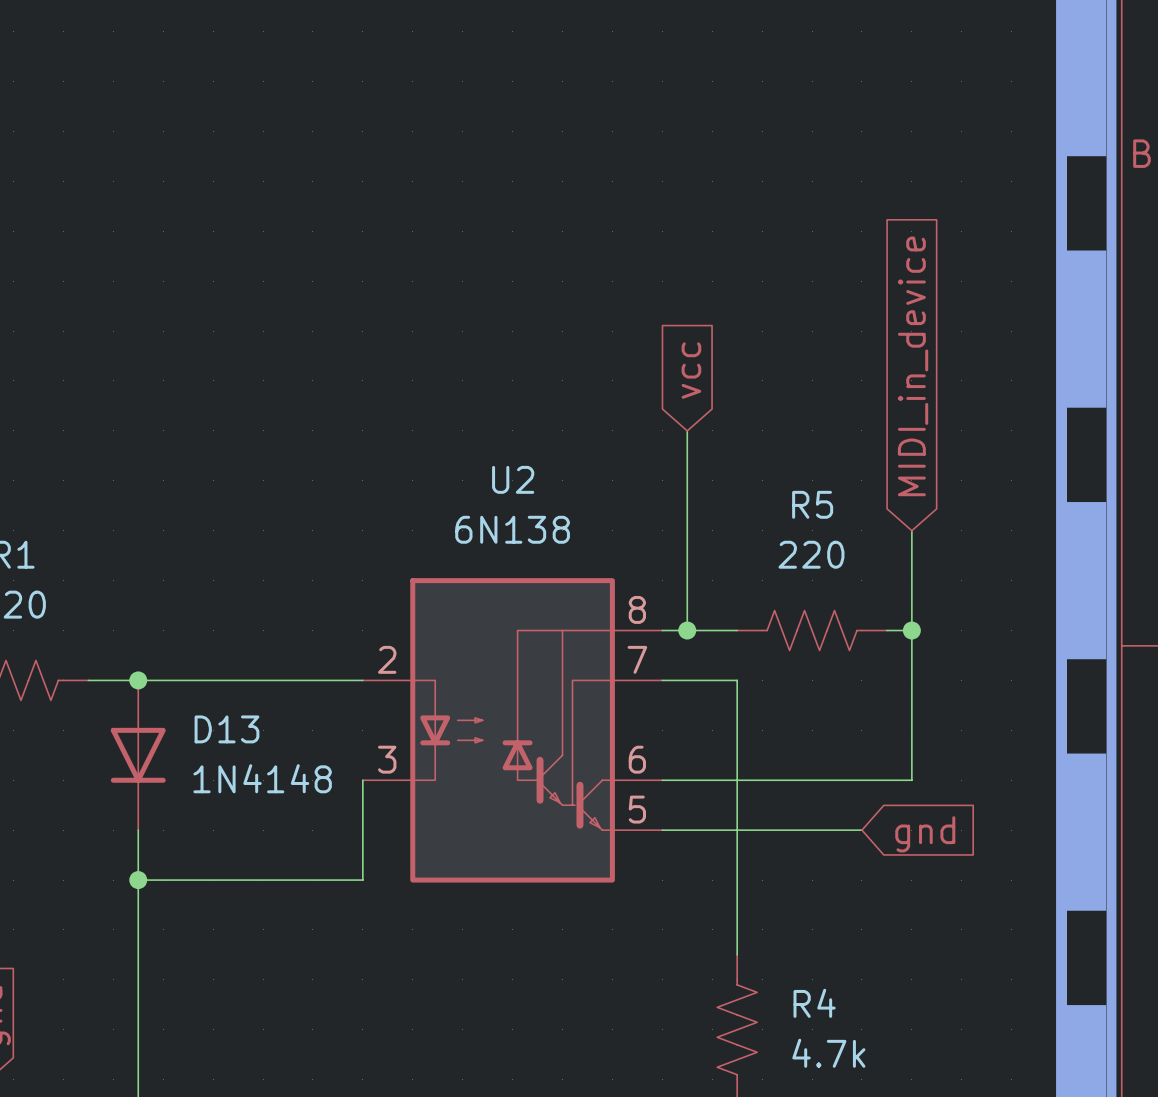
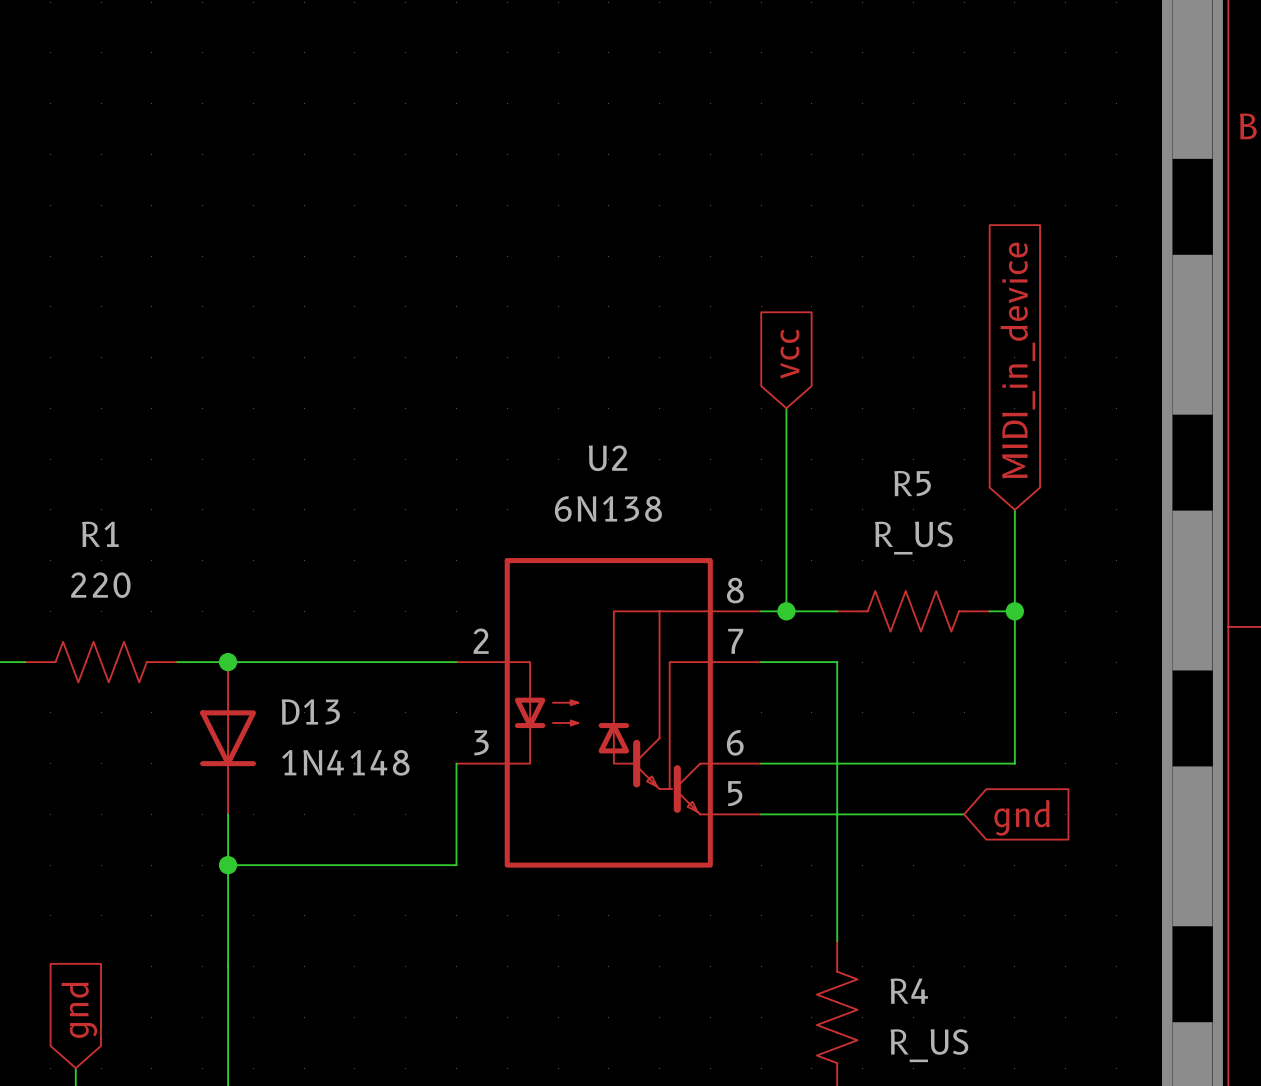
R5 value: 220 (811, 554) -> R_US (913, 538)
R4 value: 4.7k (828, 1053) -> R_US (929, 1045)

